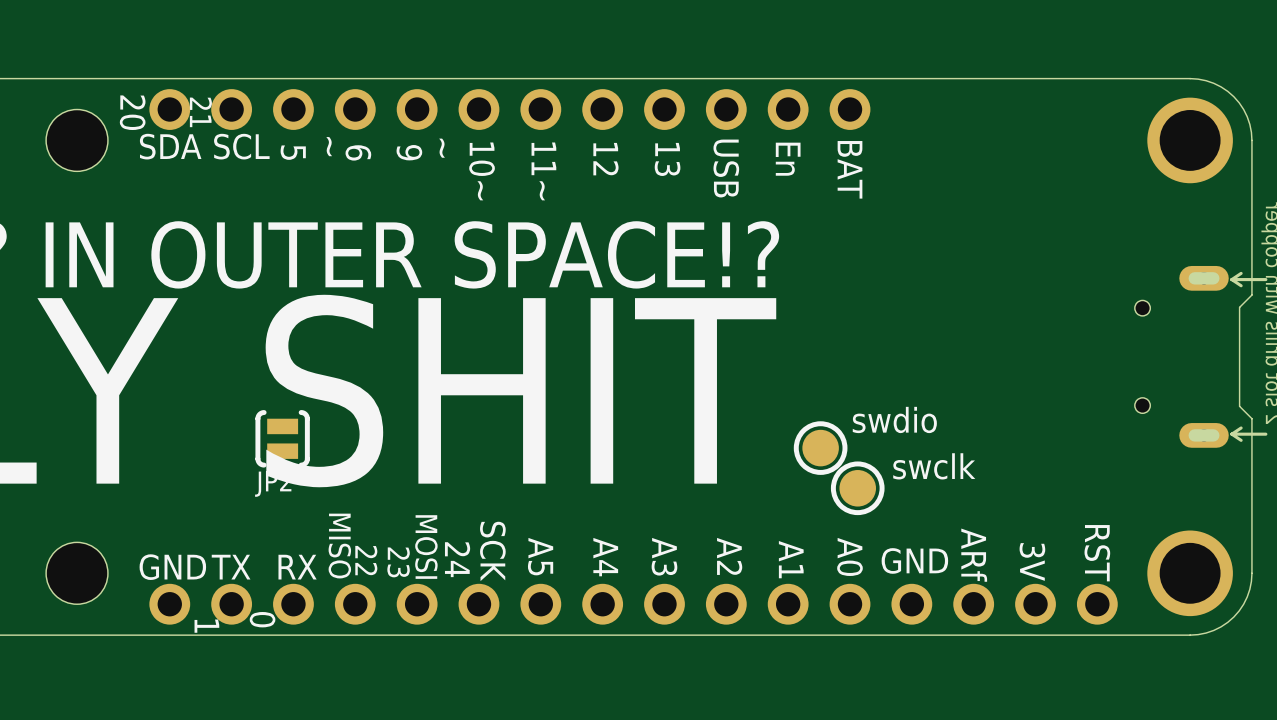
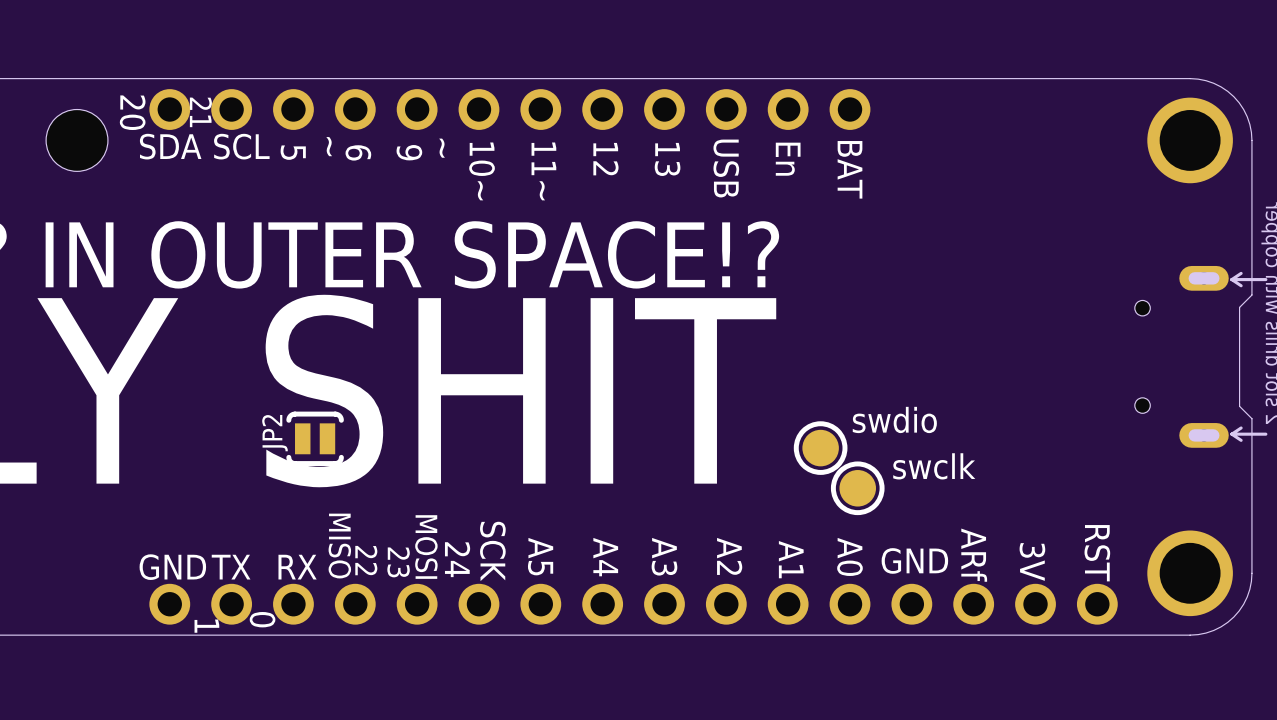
JP2 rotation: 0° (282, 438) -> 90° clockwise (315, 438)
hole: (77, 573) -> none

